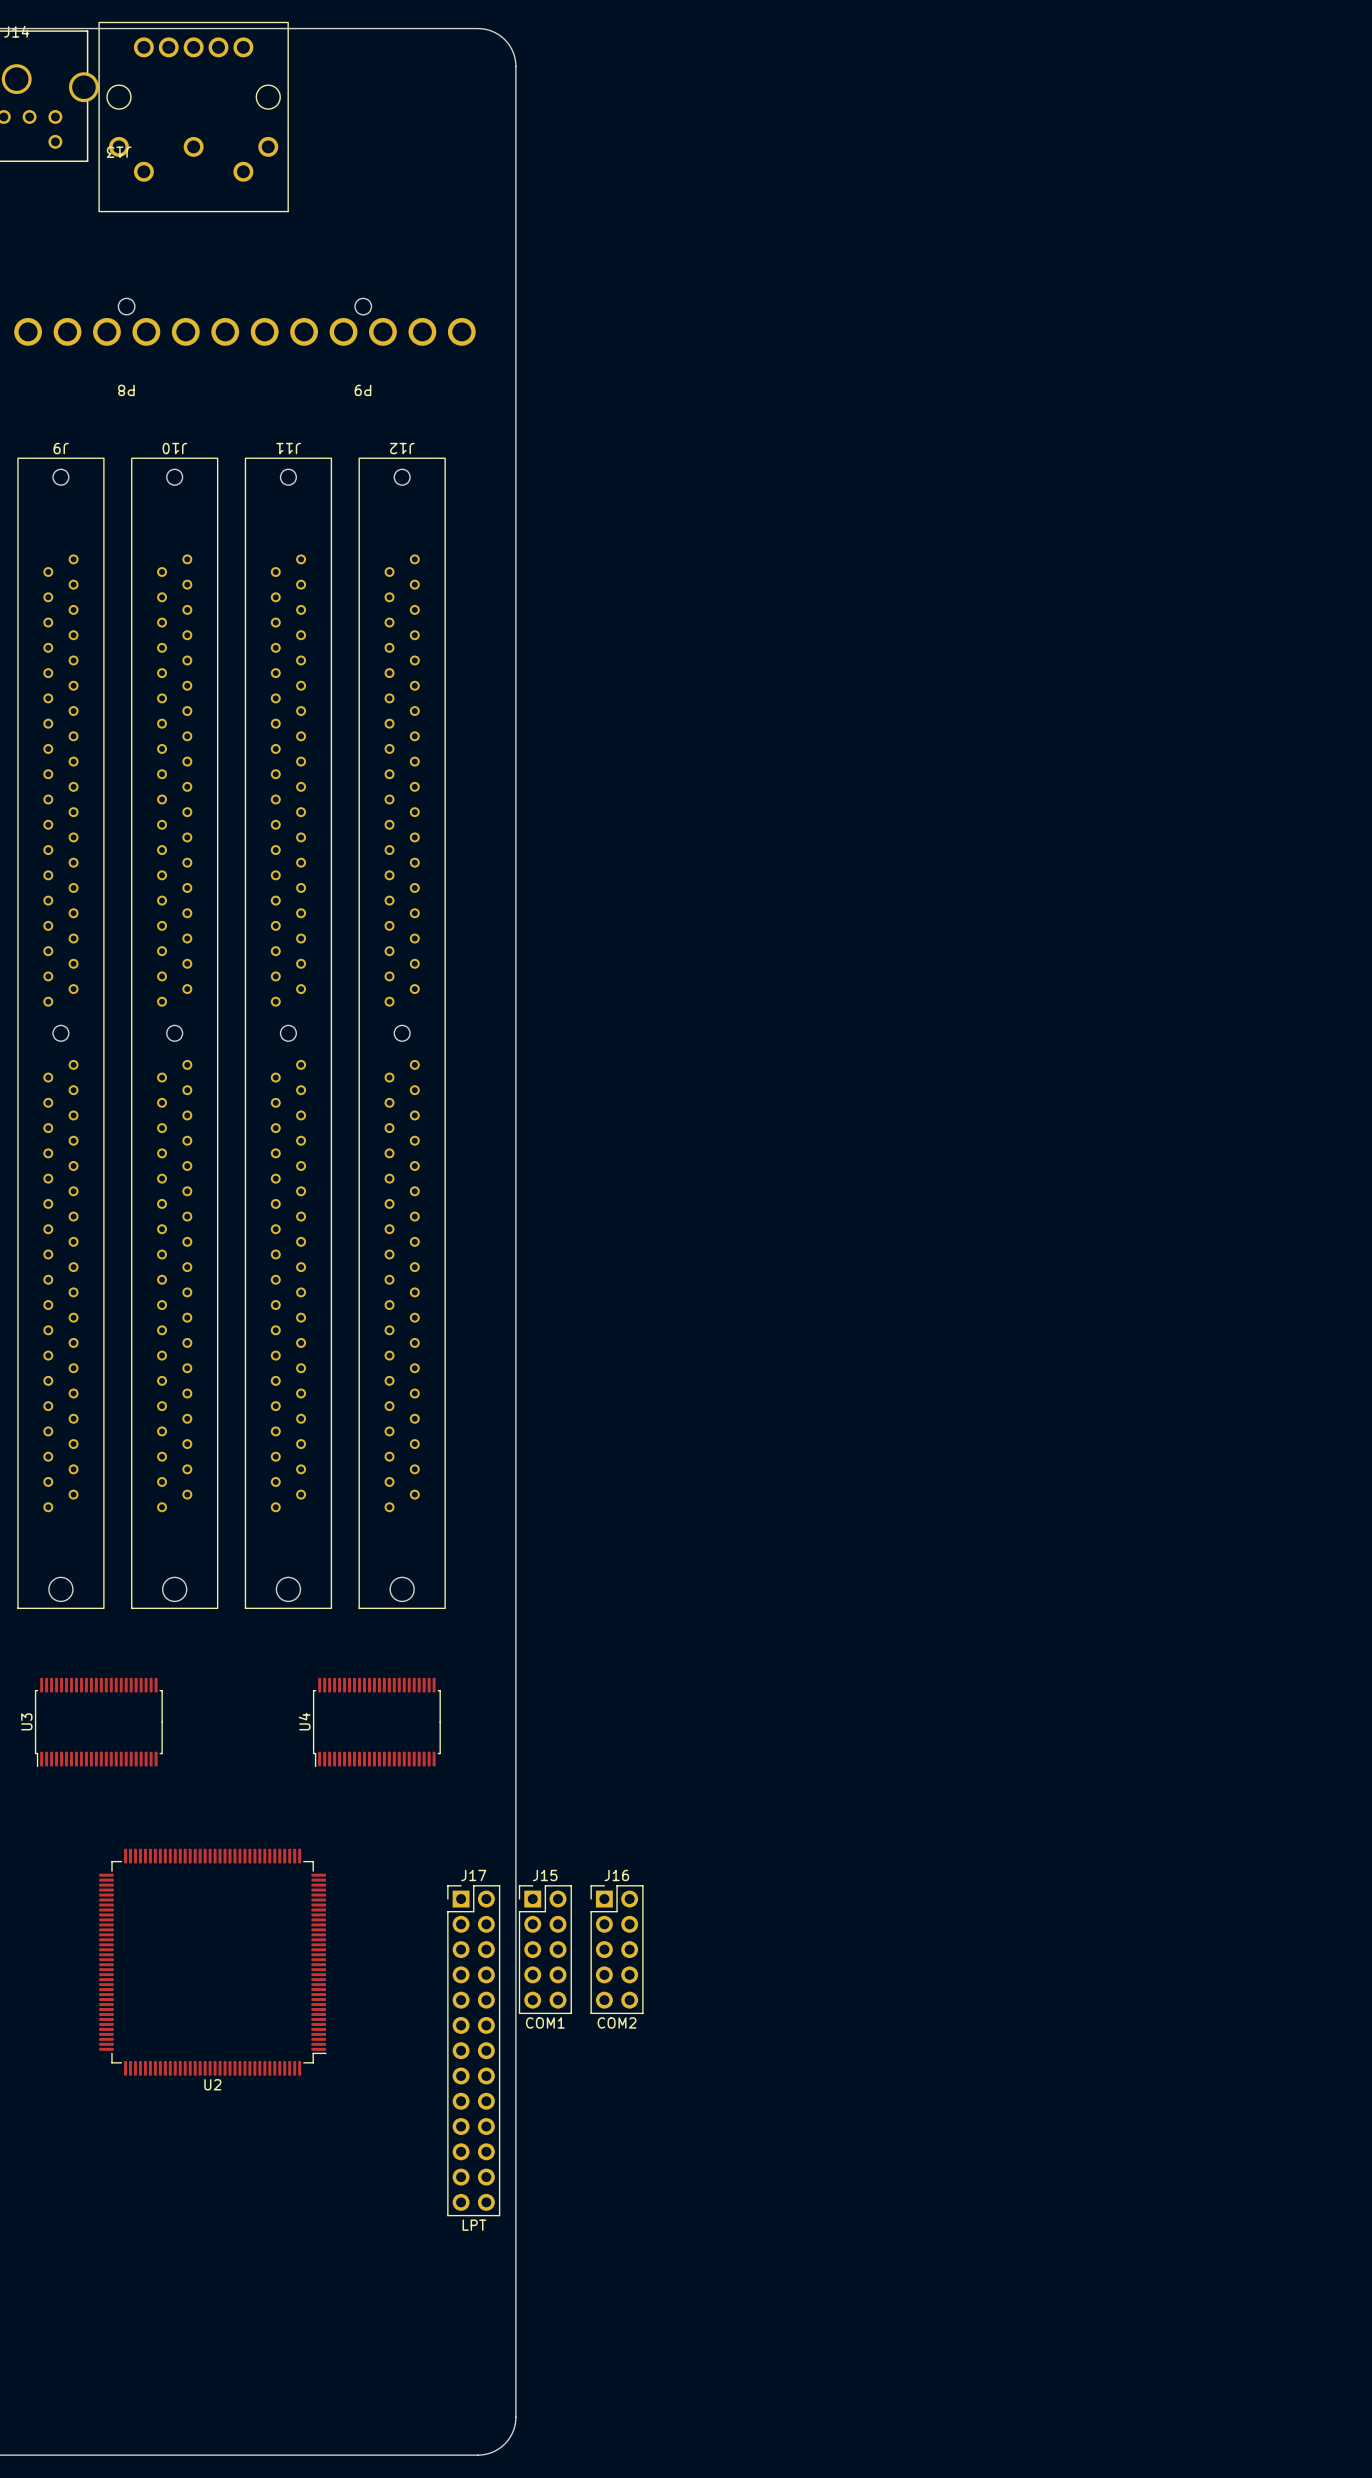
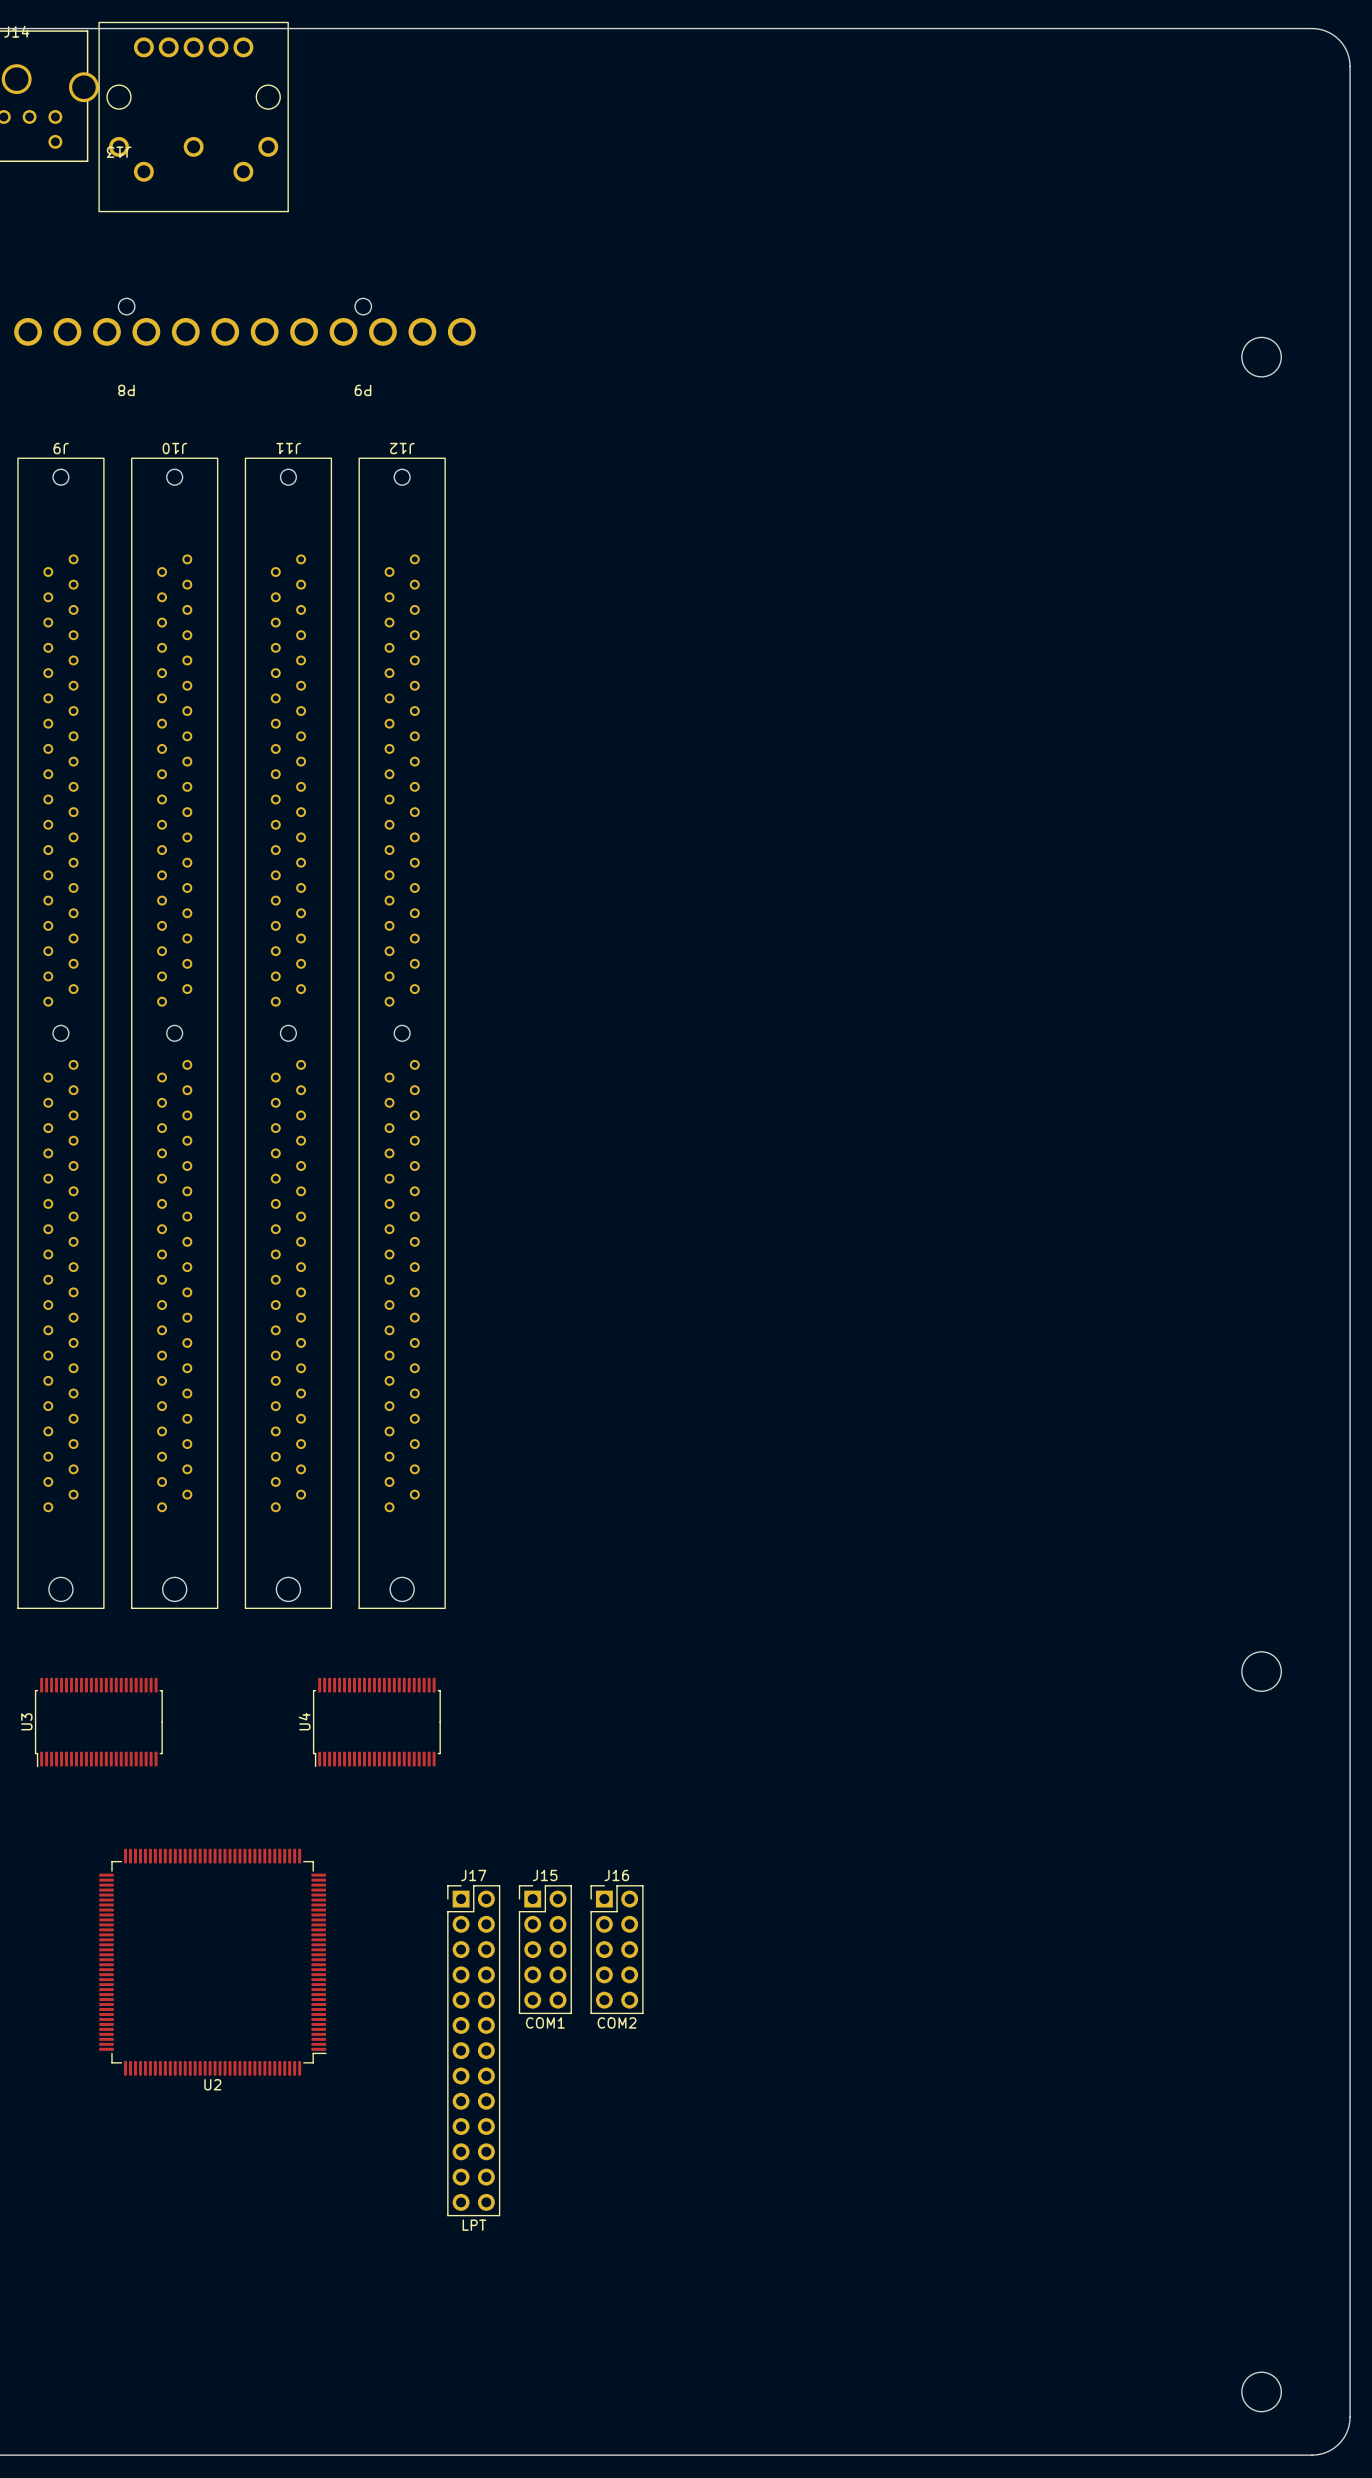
board edge: (478, 28) (490, 30) (504, 39) (513, 53) (515, 66) (515, 2417) (512, 2433) (504, 2444) (494, 2451) (478, 2455) -> (478, 28) (1312, 28) (1328, 32) (1338, 39) (1346, 50) (1350, 66) (1350, 2417) (1347, 2429) (1341, 2440) (1332, 2449) (1312, 2455) (478, 2455)
round board edge: none -> [1241, 336, 1282, 378]
round board edge: none -> [1241, 1651, 1282, 1692]
round board edge: none -> [1241, 2371, 1282, 2413]

